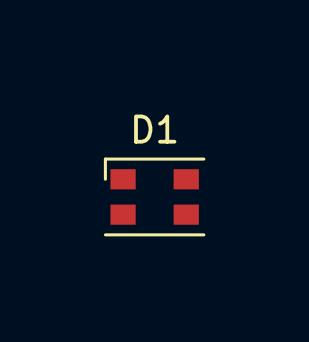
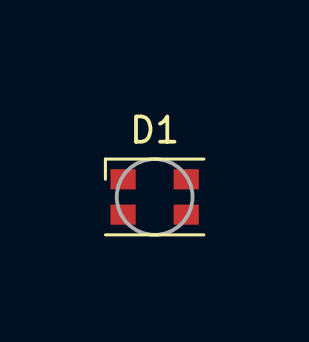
D1 footprint: [103, 157, 206, 237] -> [103, 157, 206, 237]

